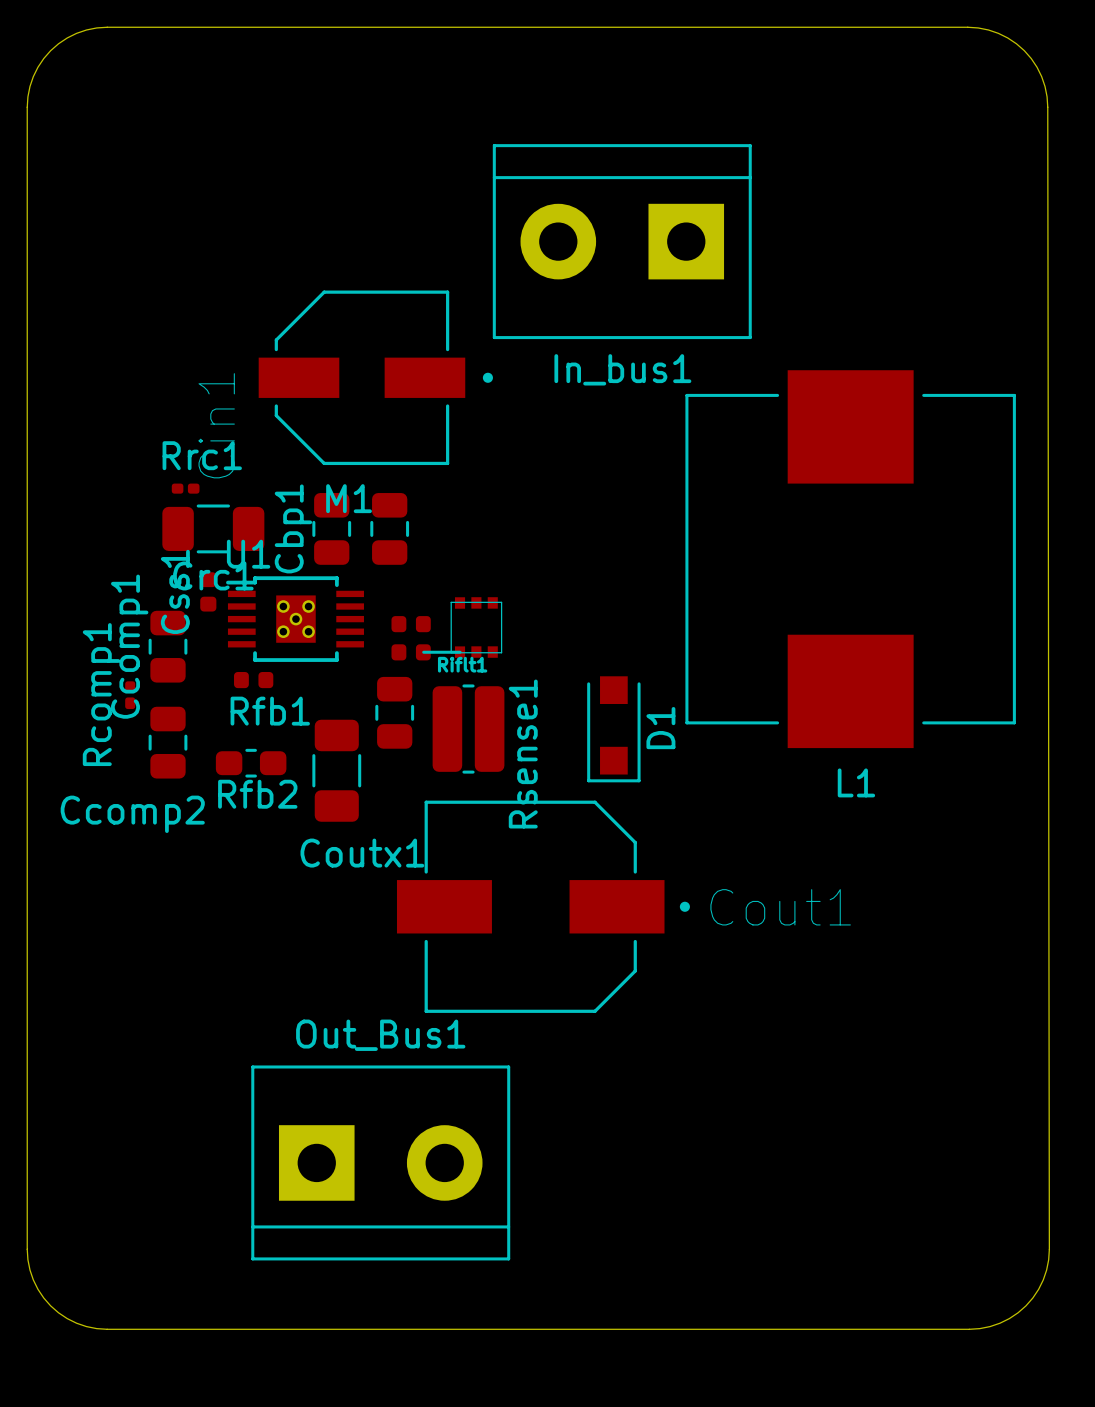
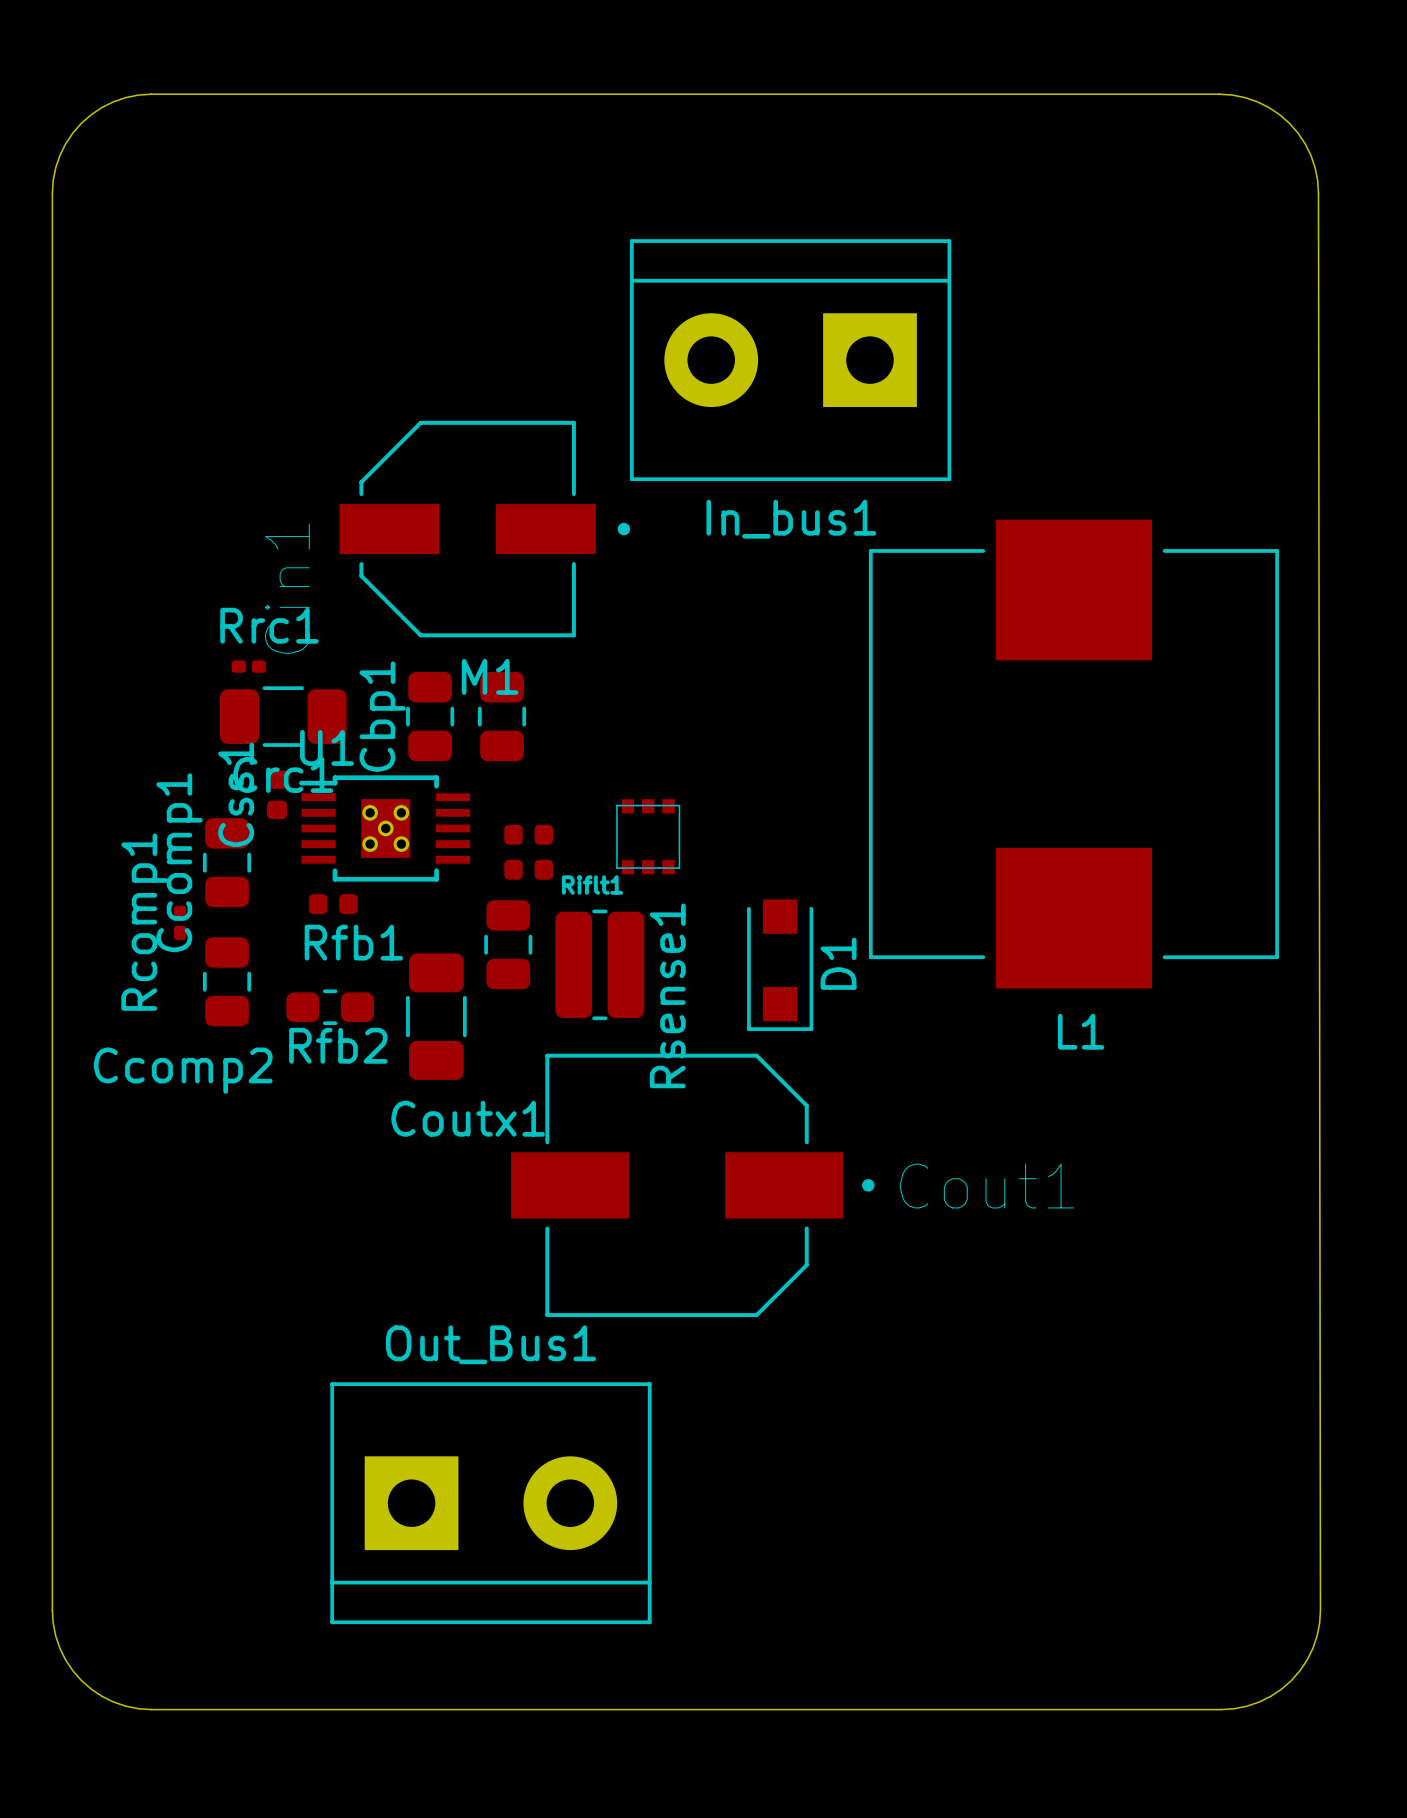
M1 position: (476, 627) -> (648, 836)
line: (423, 652) (460, 652) -> none

